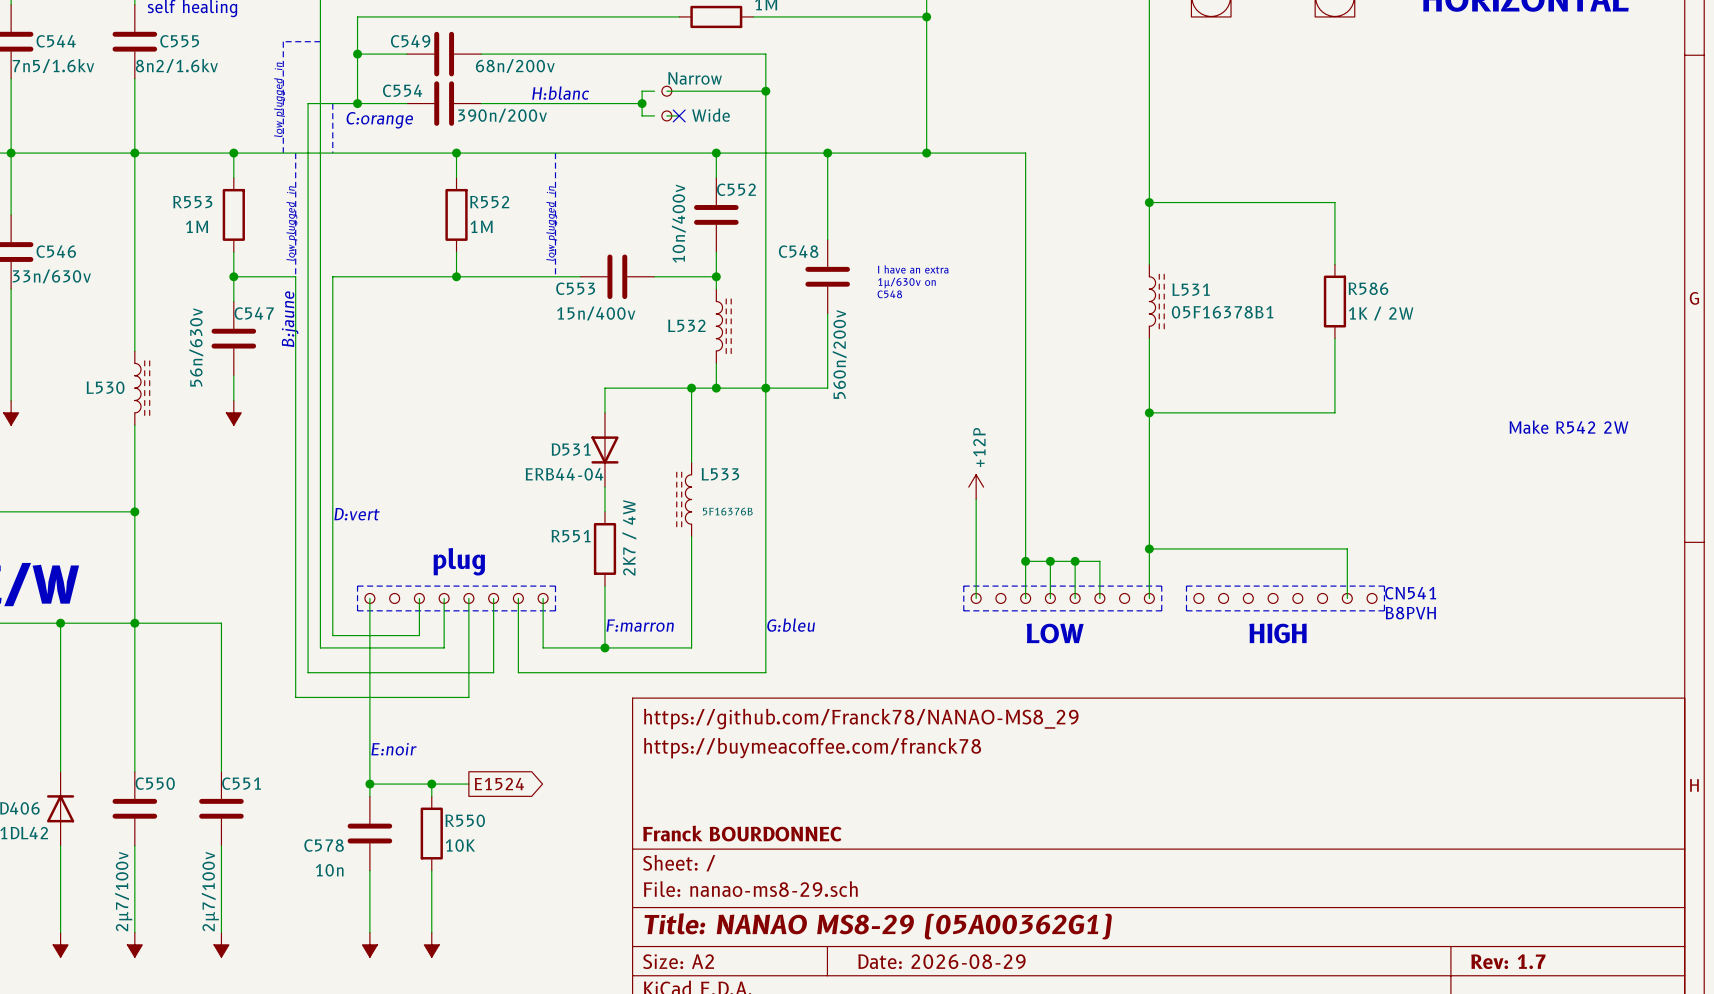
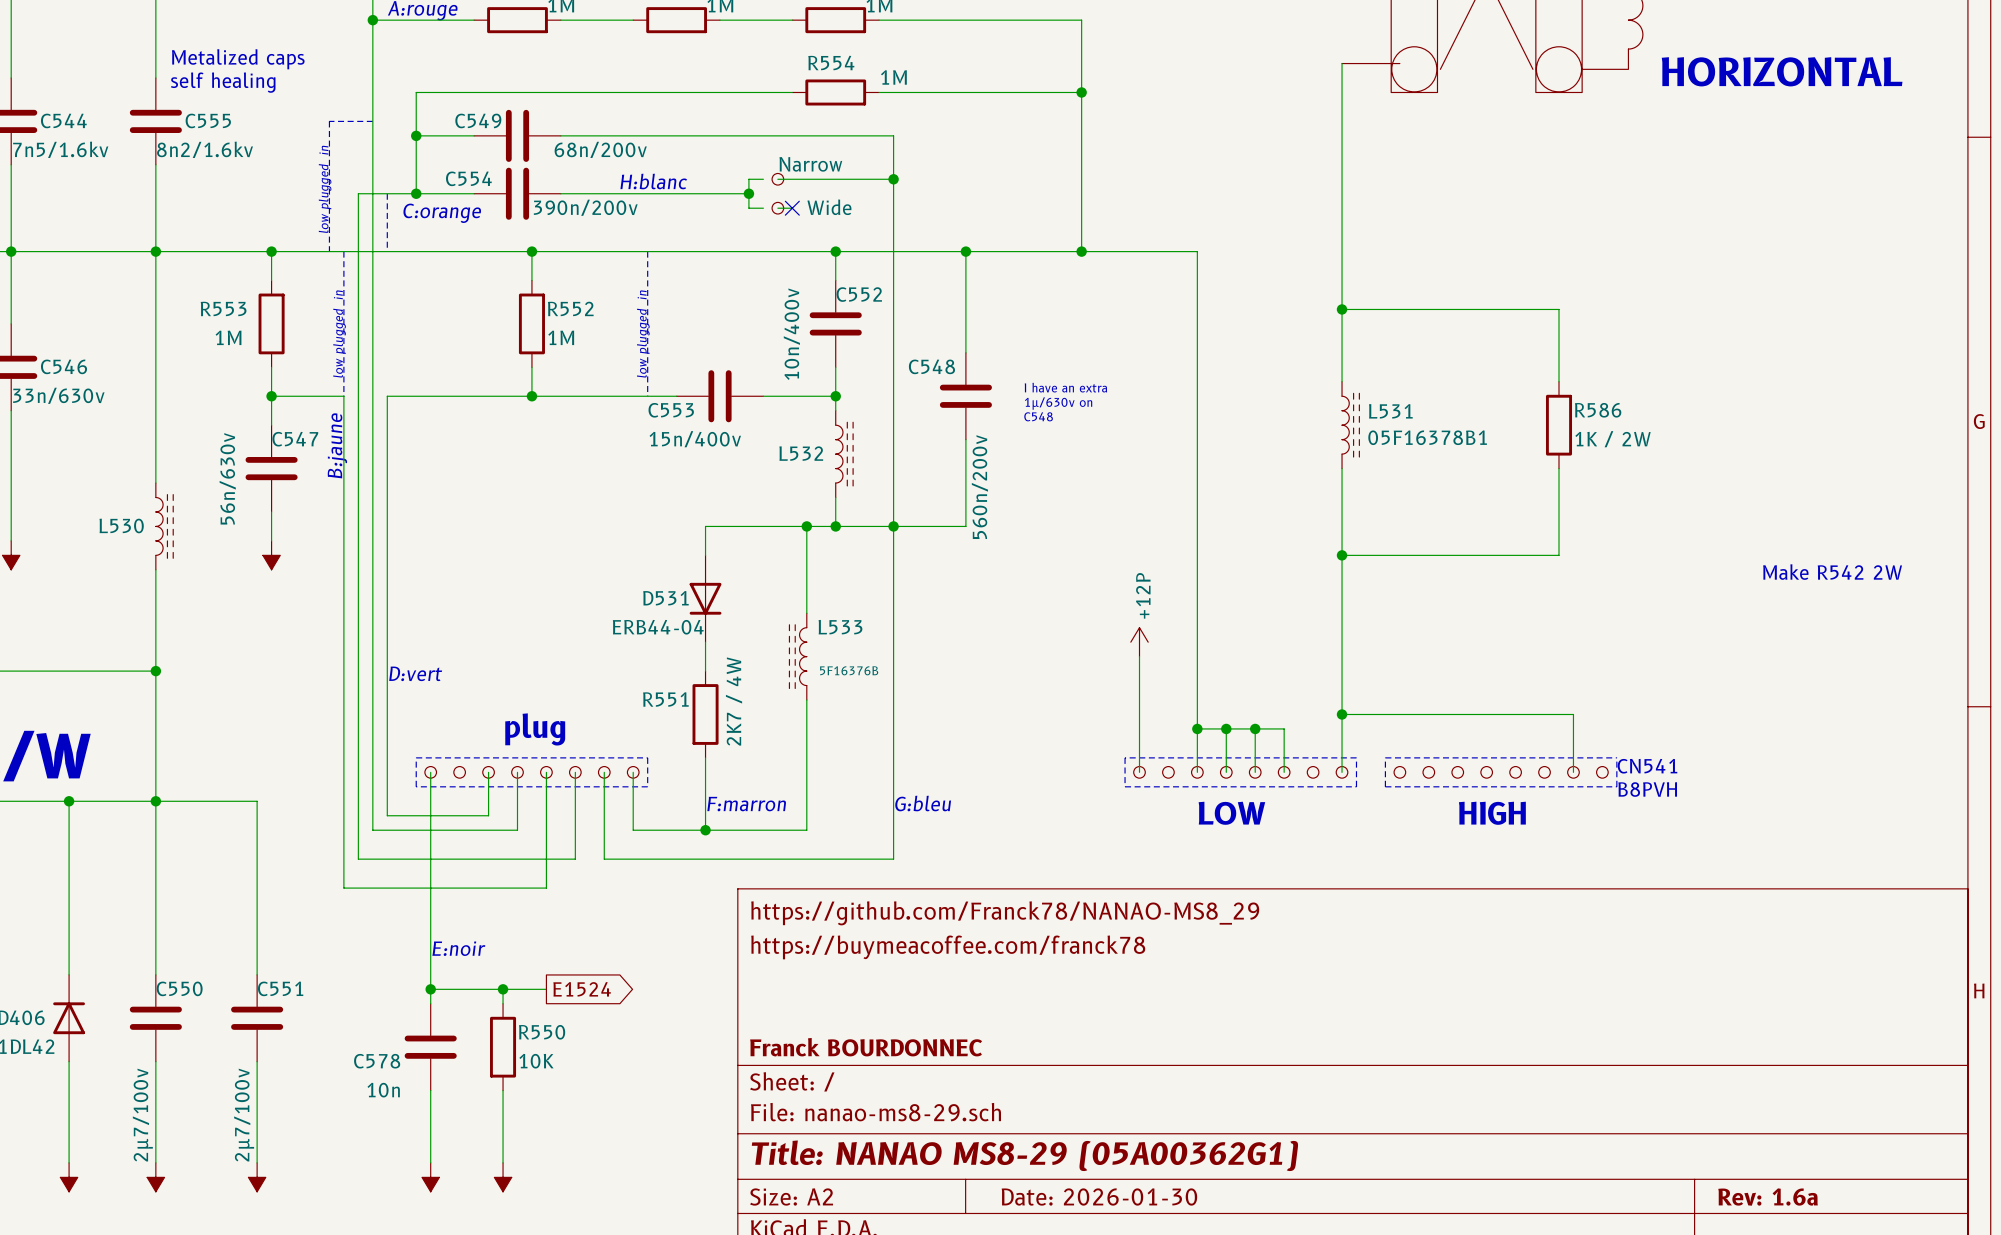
title block: Date: 2026-08-29 (941, 961) -> Date: 2026-01-30 (1099, 1196)
title block: Rev: 1.7 (1508, 961) -> Rev: 1.6a (1768, 1197)

